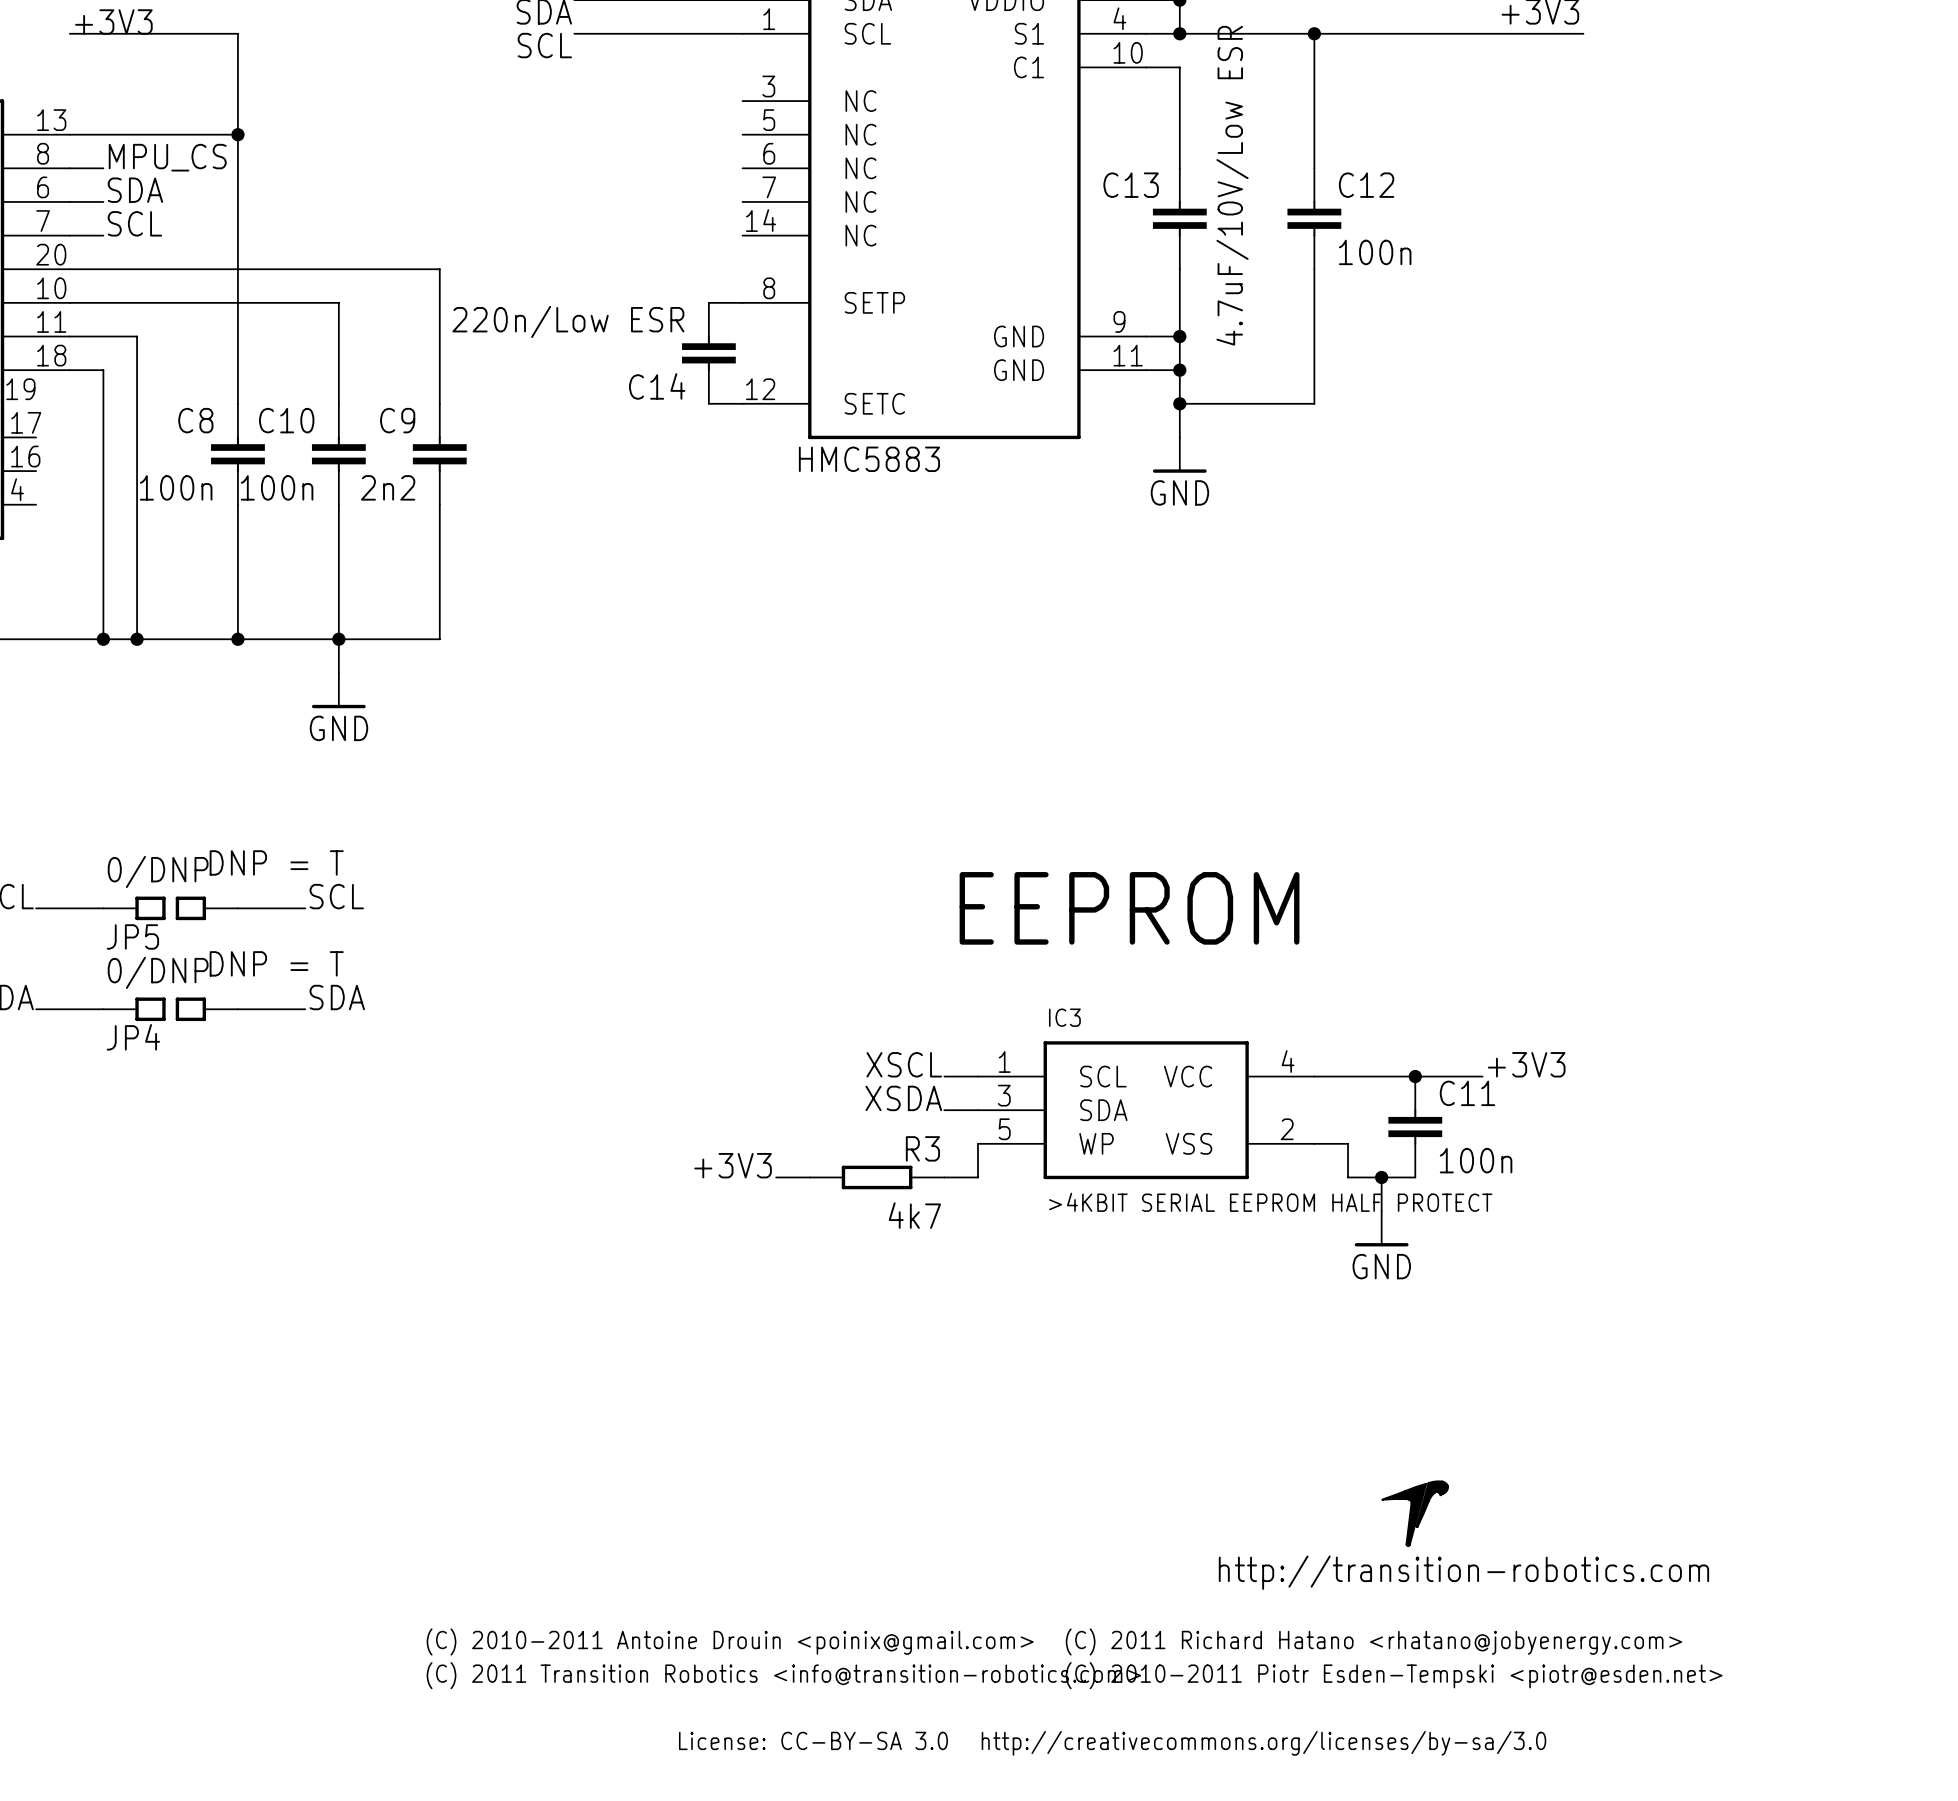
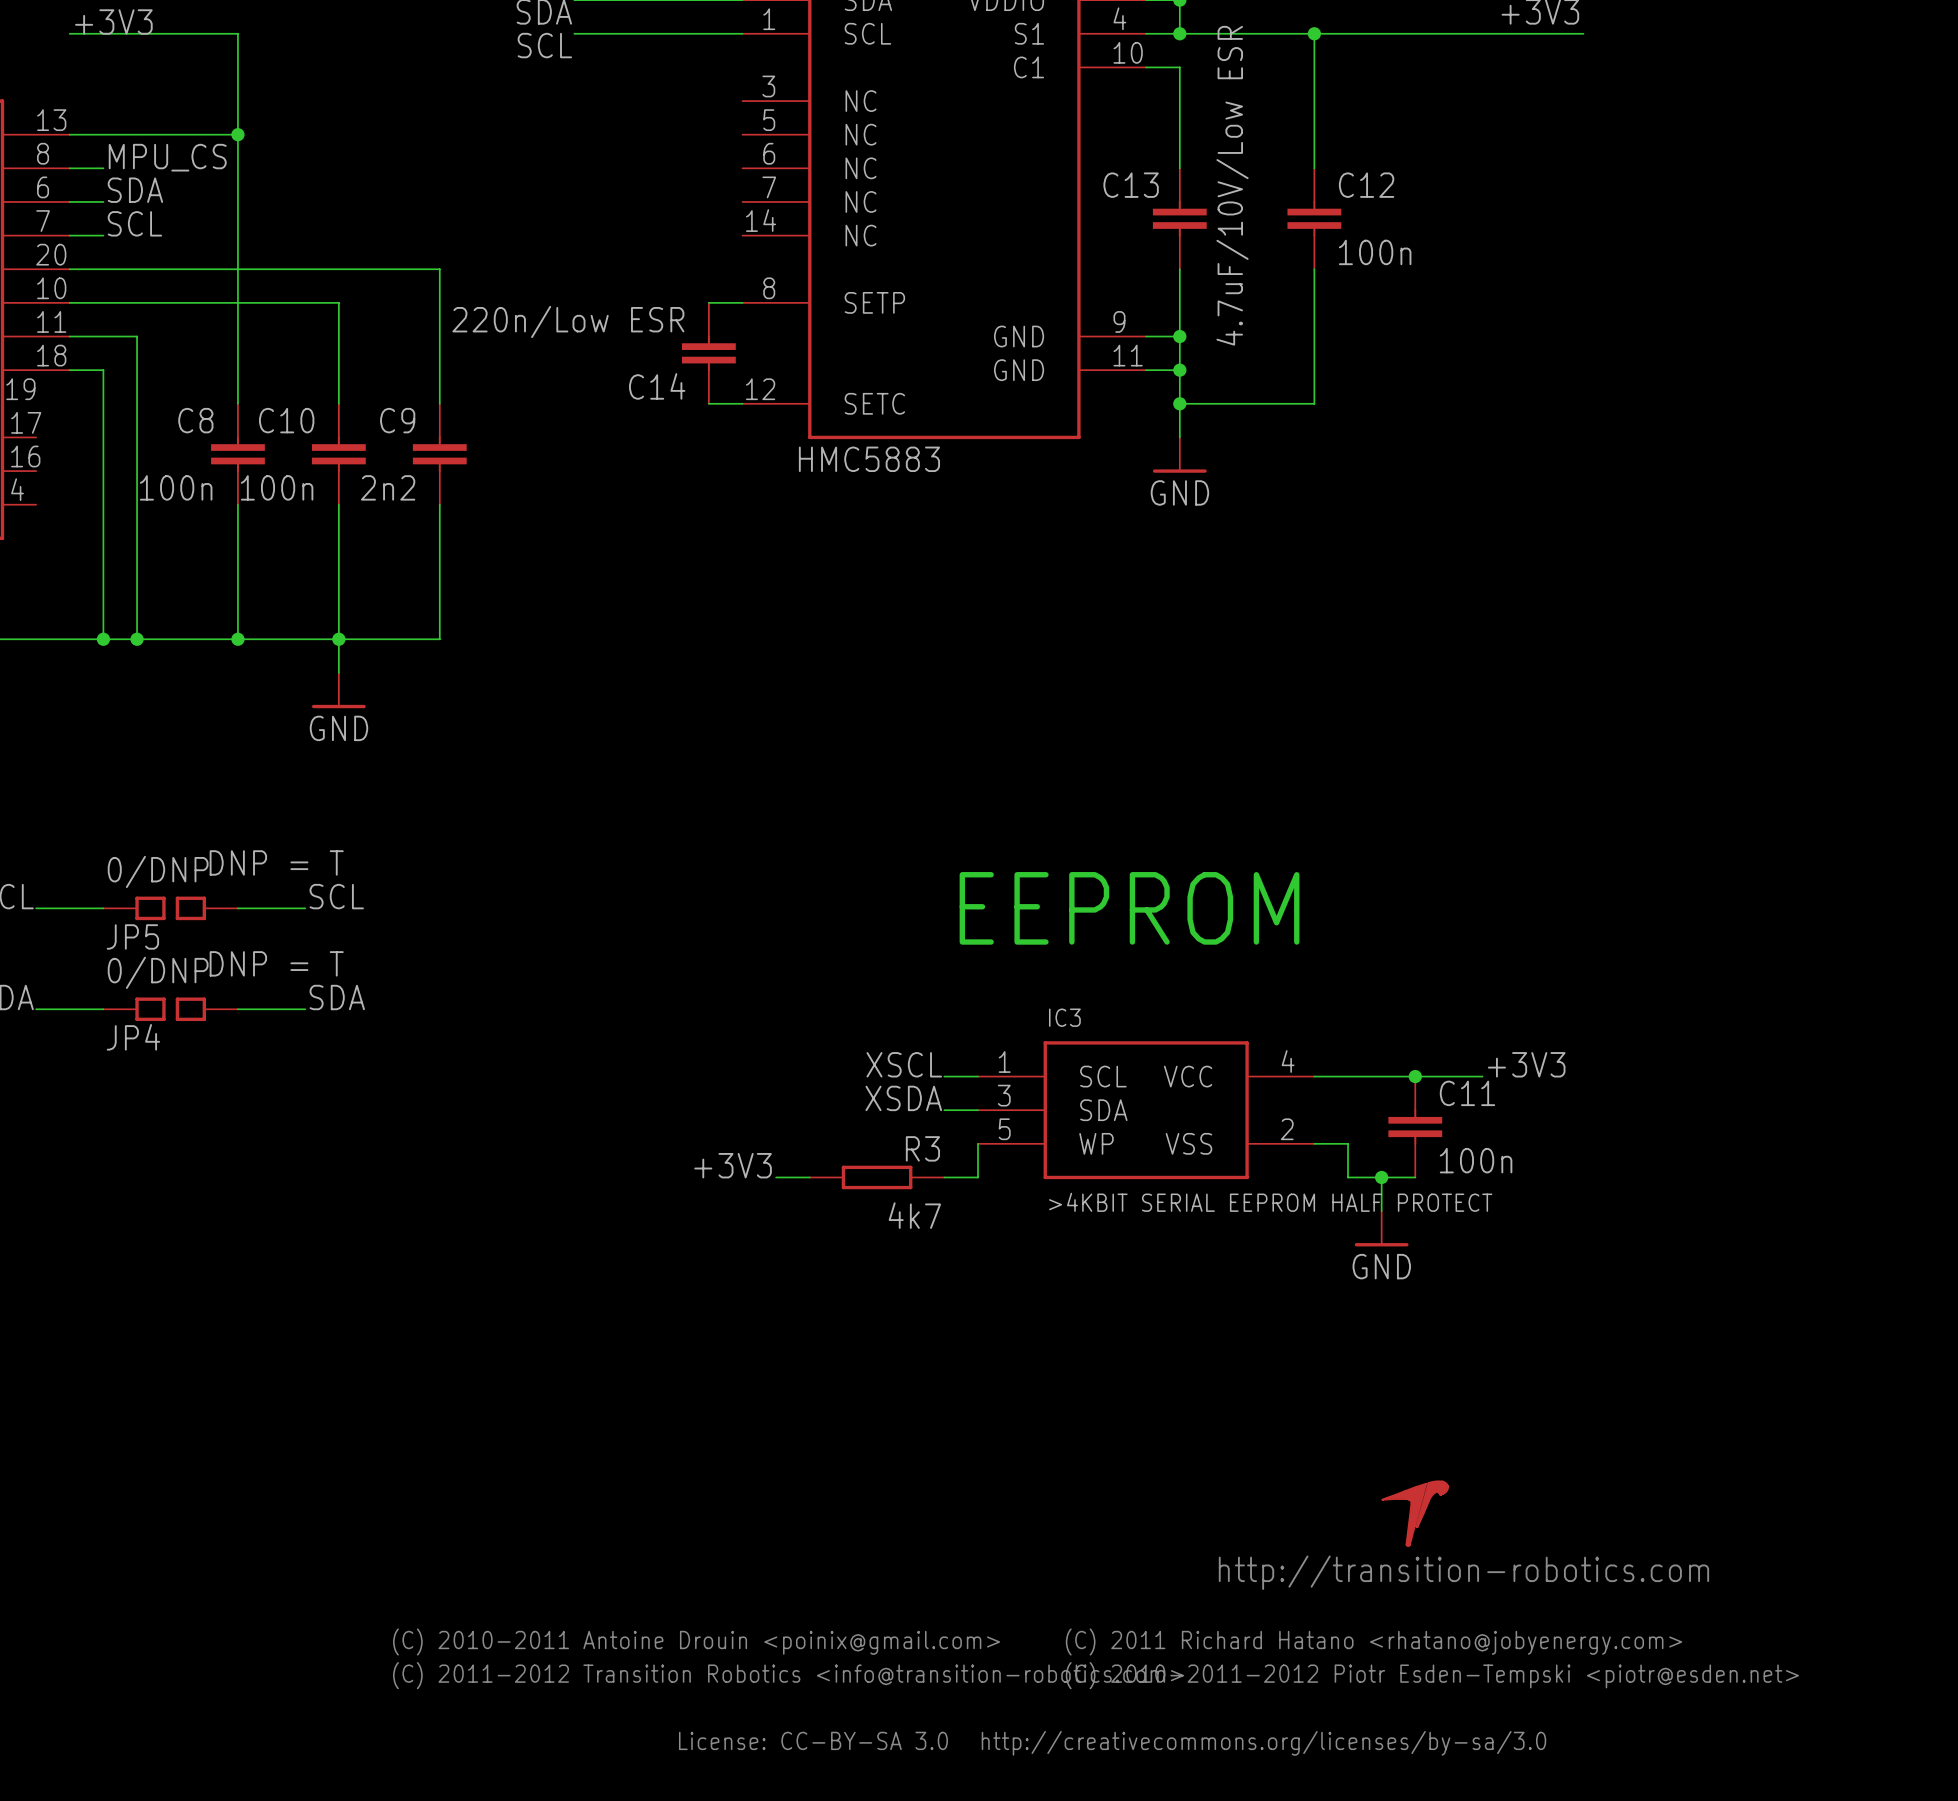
text position: (C) 2010-2011 Antoine Drouin <poinix@gmail.com> (730, 1642) -> (C) 2010-2011 Antoine Drouin <poinix@gmail.com> (696, 1642)
text: (C) 2011 Transition Robotics <info@transition-robotics.com> (783, 1675) -> (C) 2011-2012 Transition Robotics <info@transition-robotics.com> (788, 1675)
text: (C) 2010-2011 Piotr Esden-Tempski <piotr@esden.net> (1394, 1675) -> (C) 2010-2011-2012 Piotr Esden-Tempski <piotr@esden.net> (1432, 1675)

